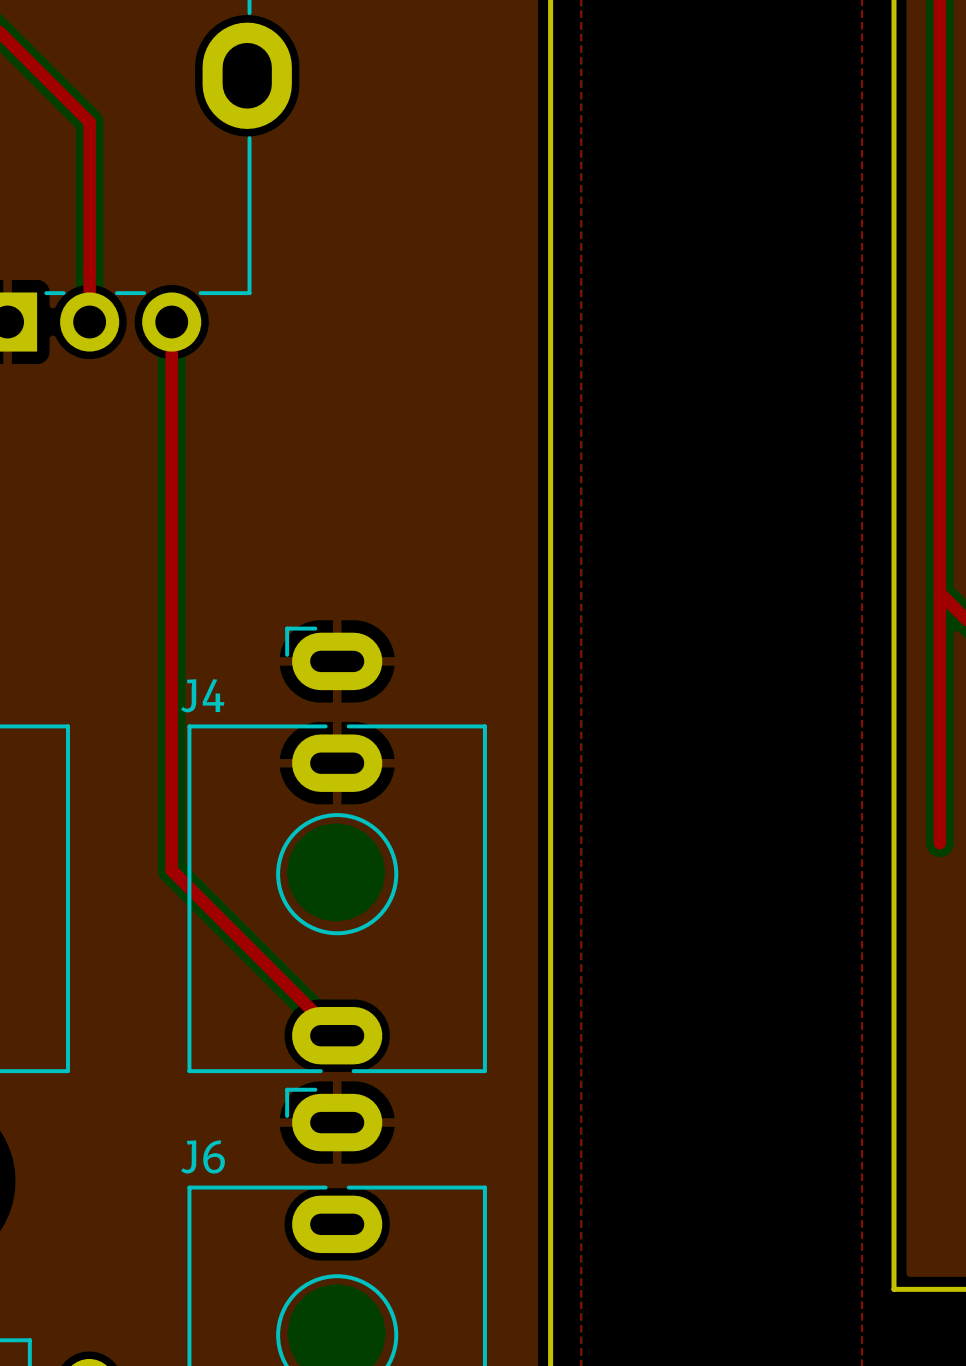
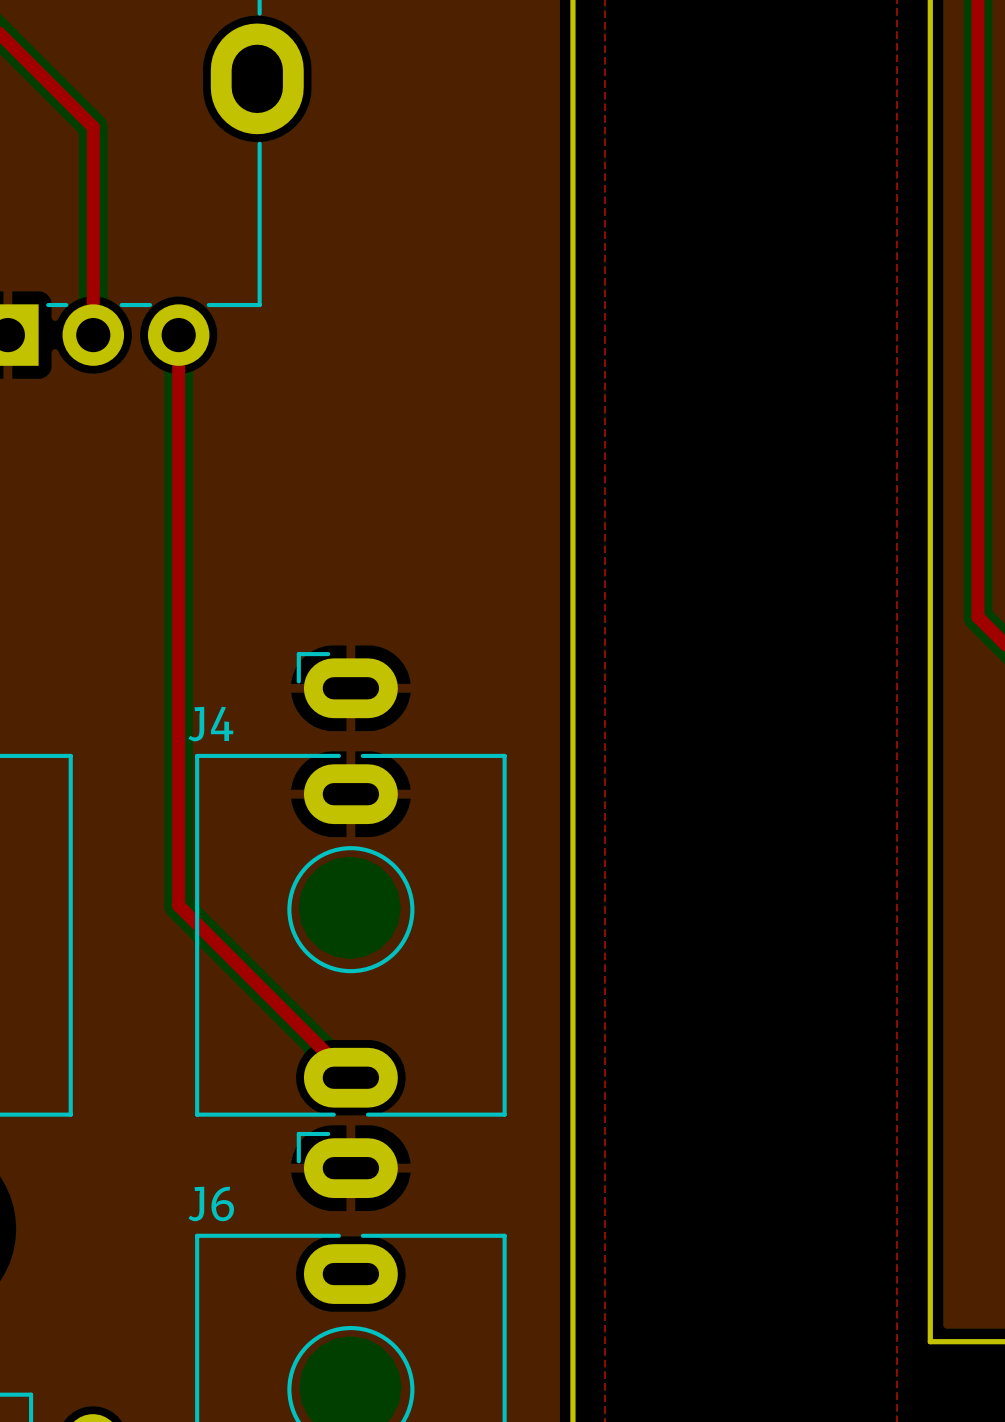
top track: (939, 593) (939, 843) -> none

